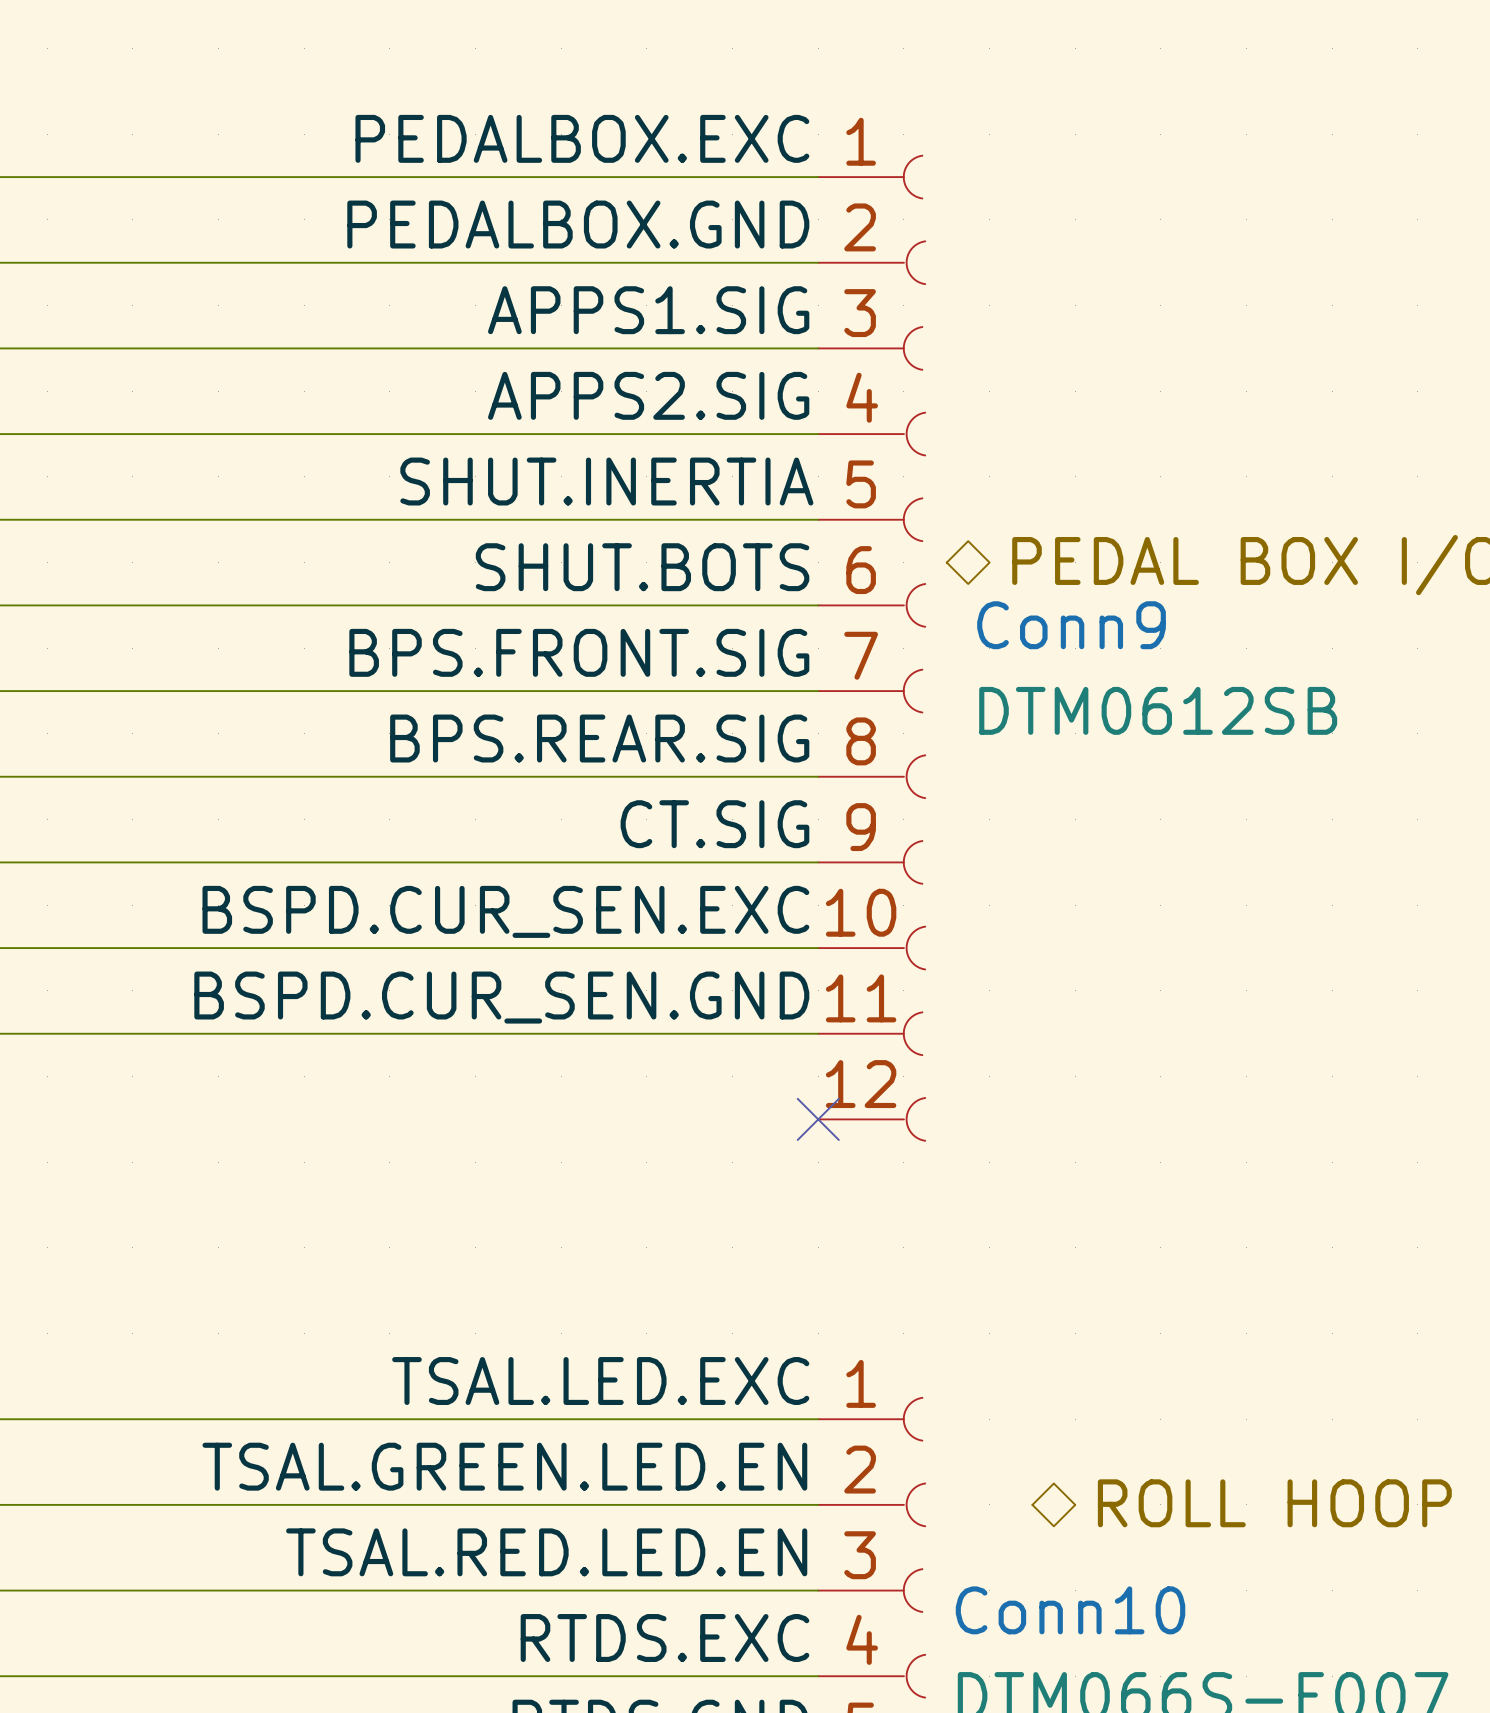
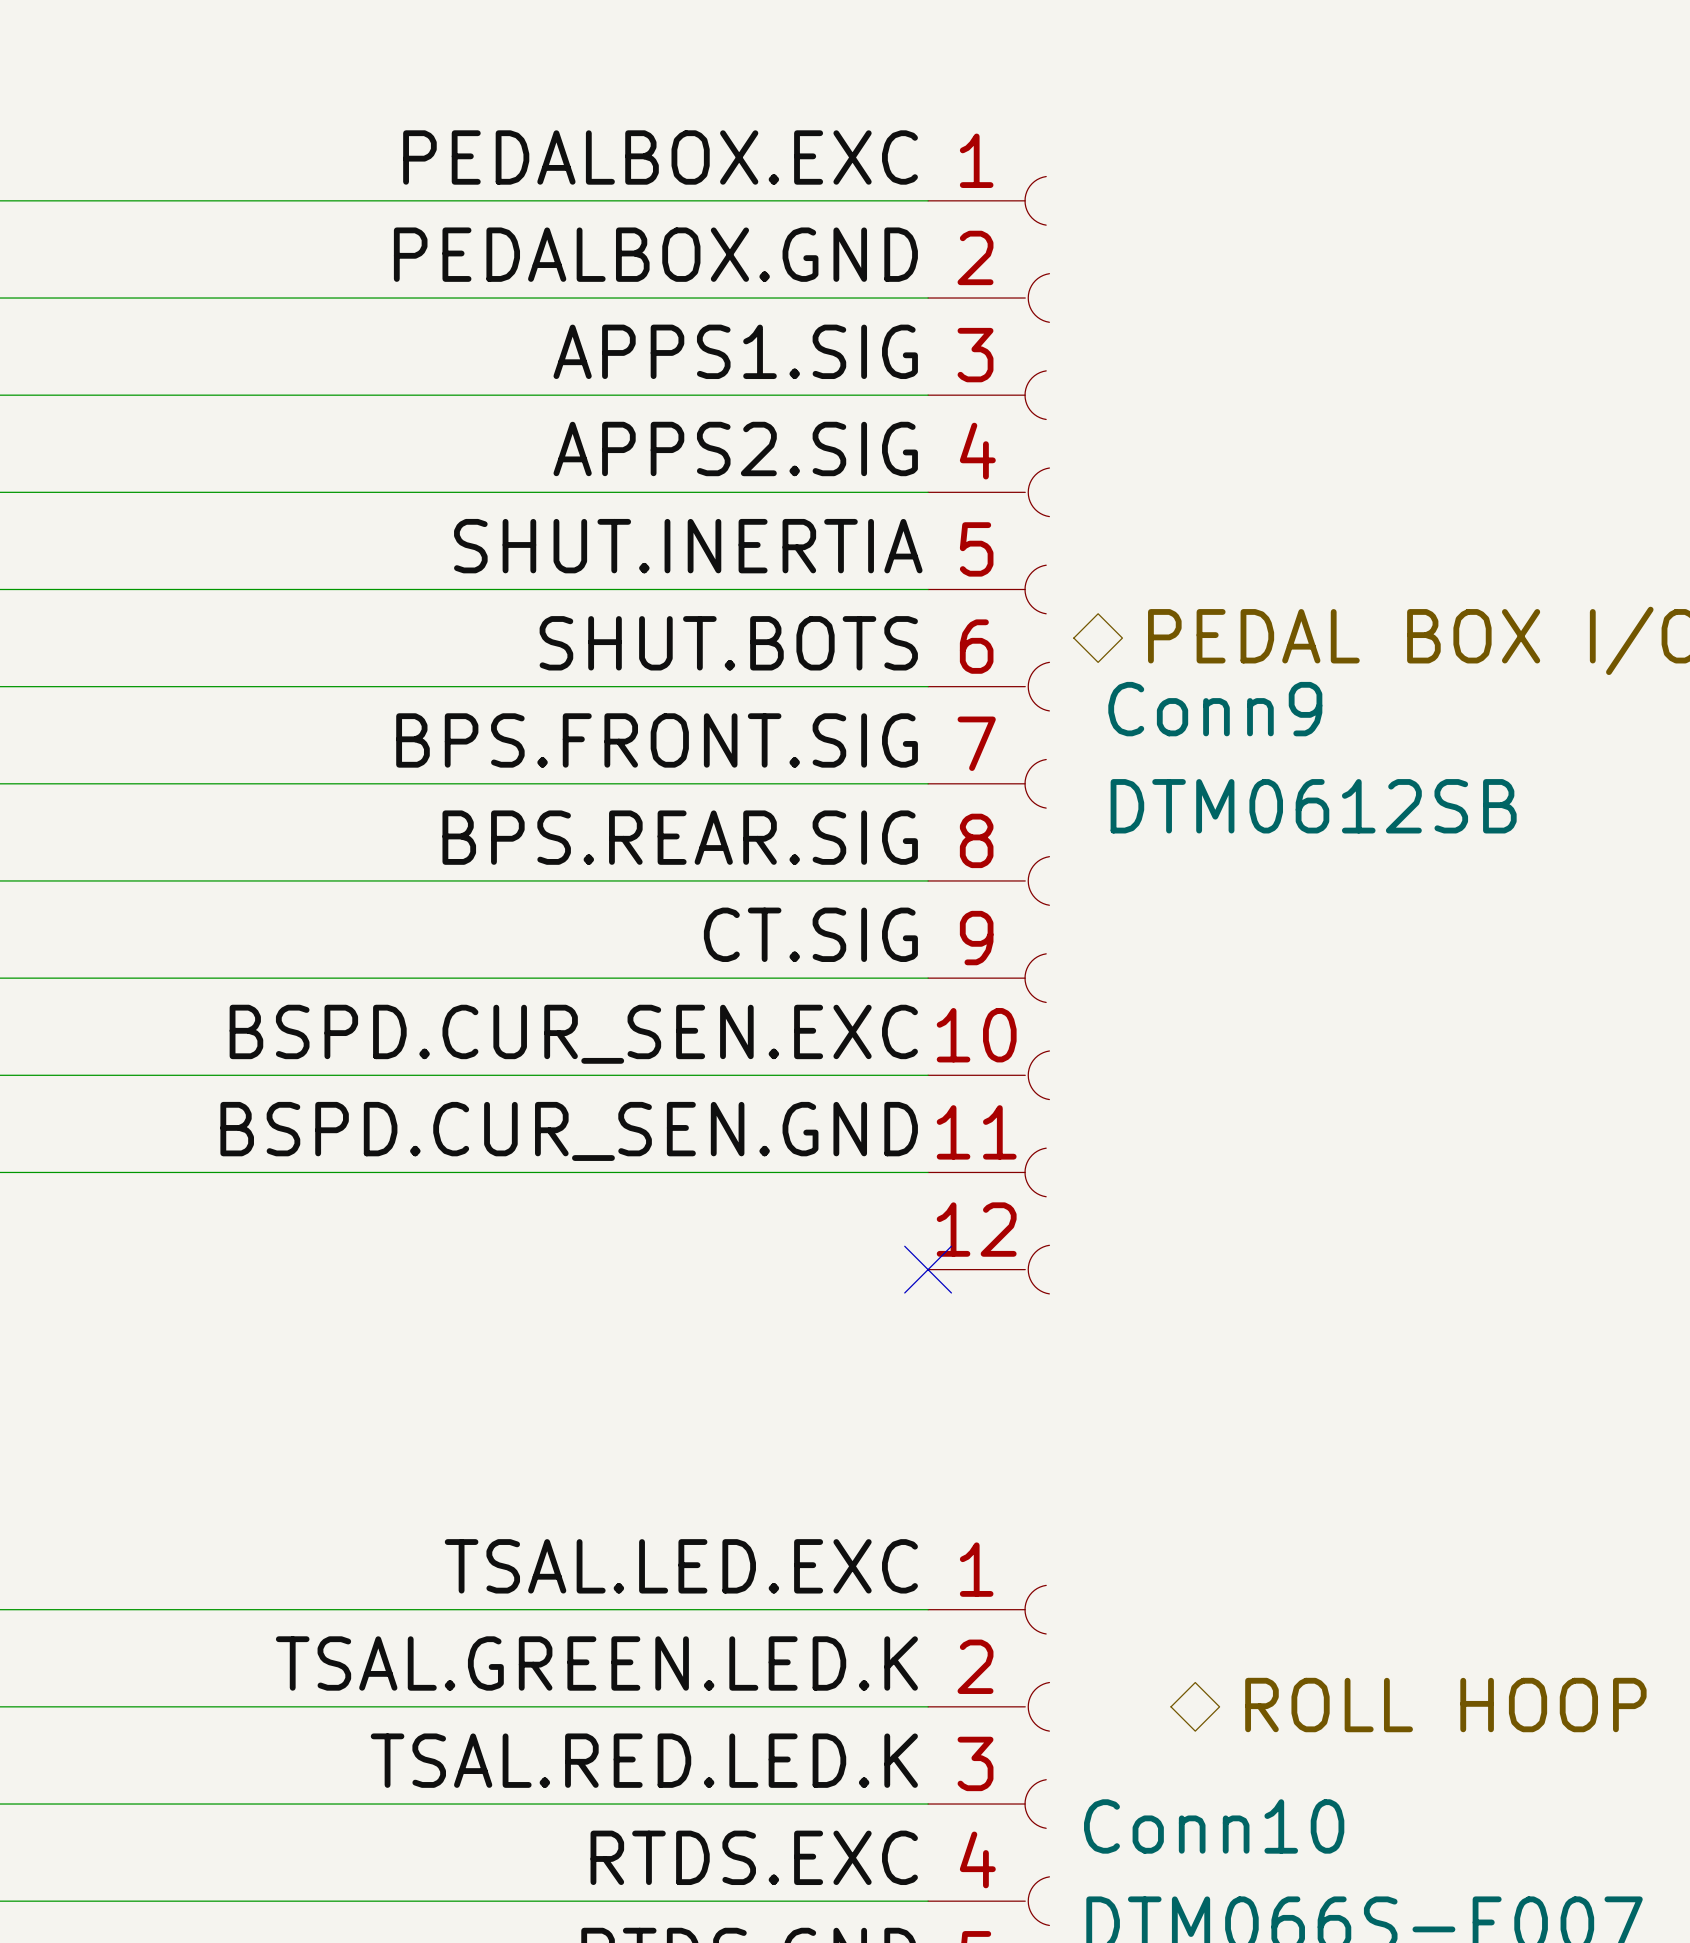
label: TSAL.GREEN.LED.EN (504, 1466) -> TSAL.GREEN.LED.K (596, 1663)
label: TSAL.RED.LED.EN (546, 1552) -> TSAL.RED.LED.K (644, 1760)

